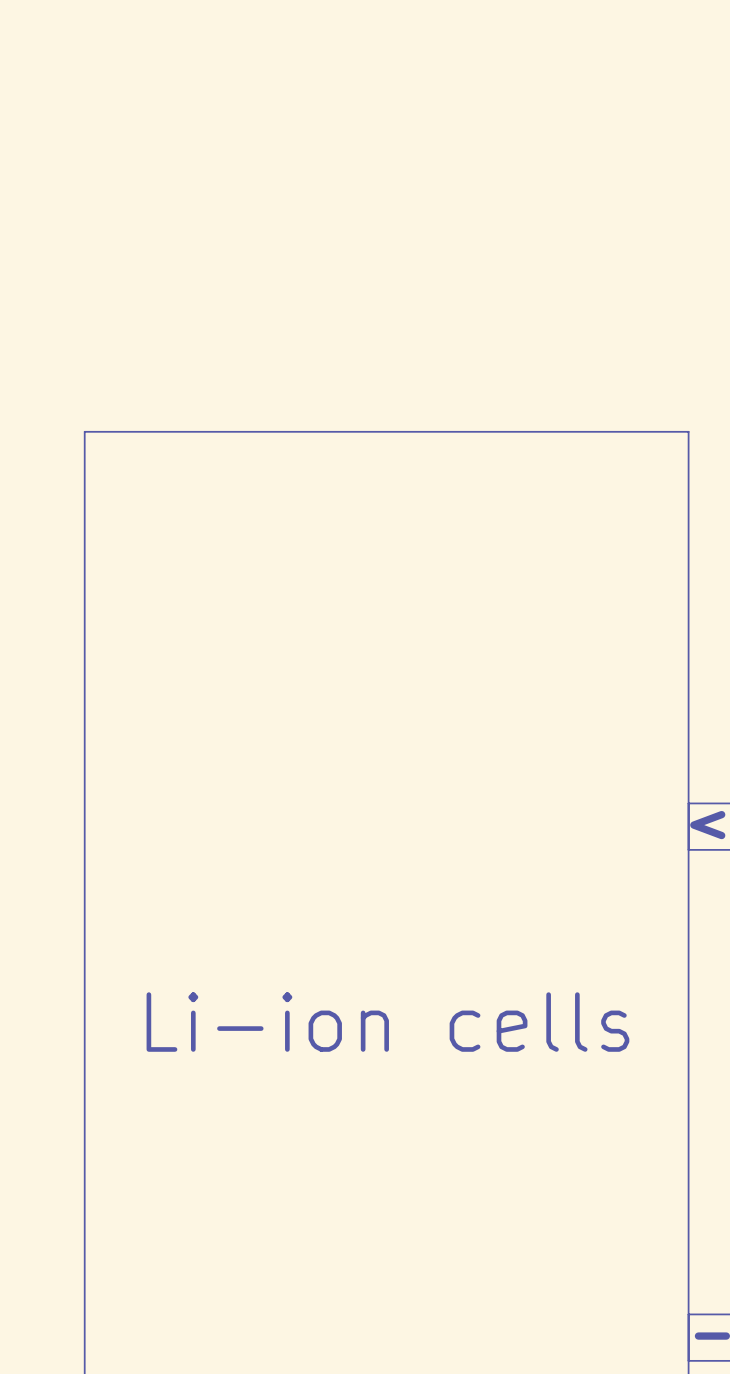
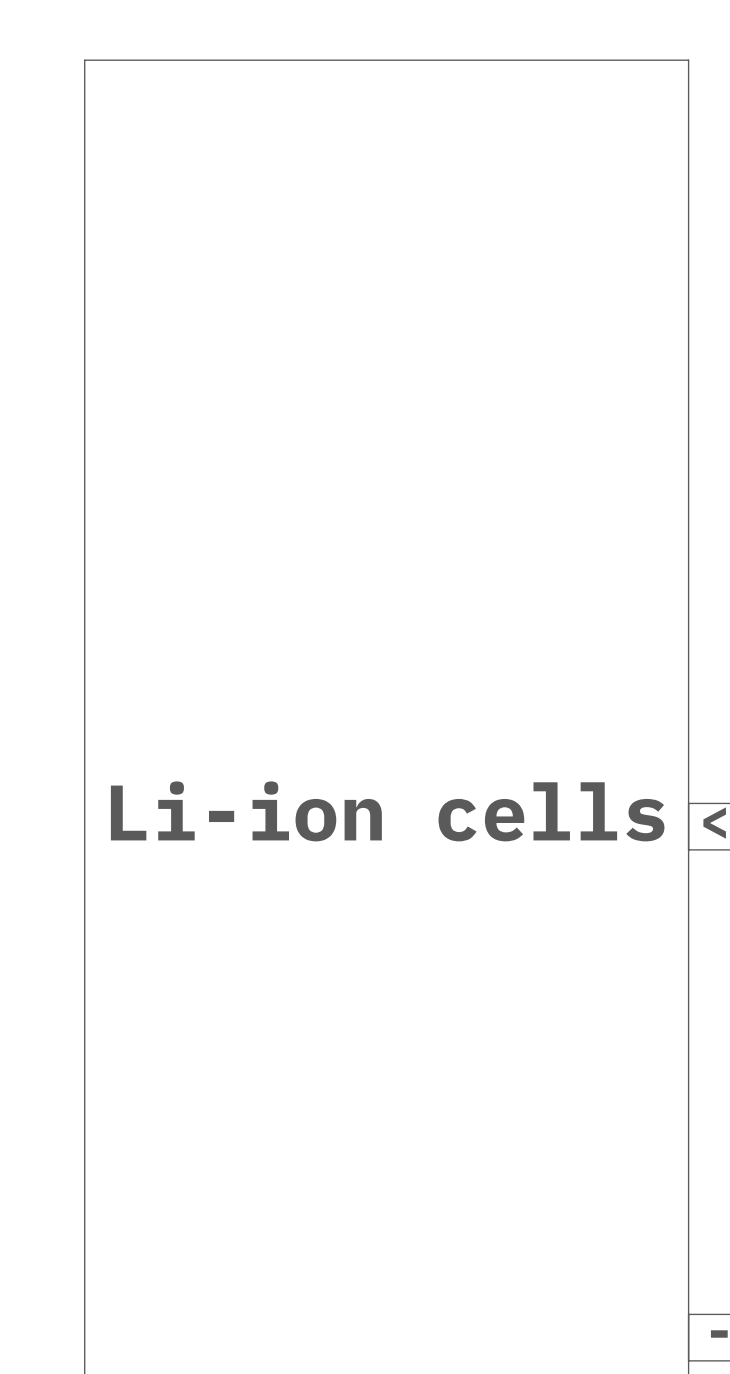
line: (84, 431) (688, 431) -> (84, 431) (84, 60) (688, 60) (688, 431)
text position: Li-ion cells (387, 1022) -> Li-ion cells (387, 811)

